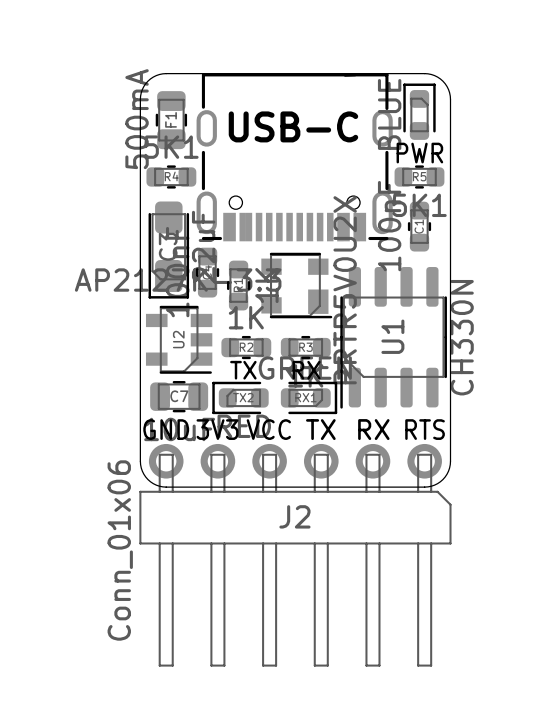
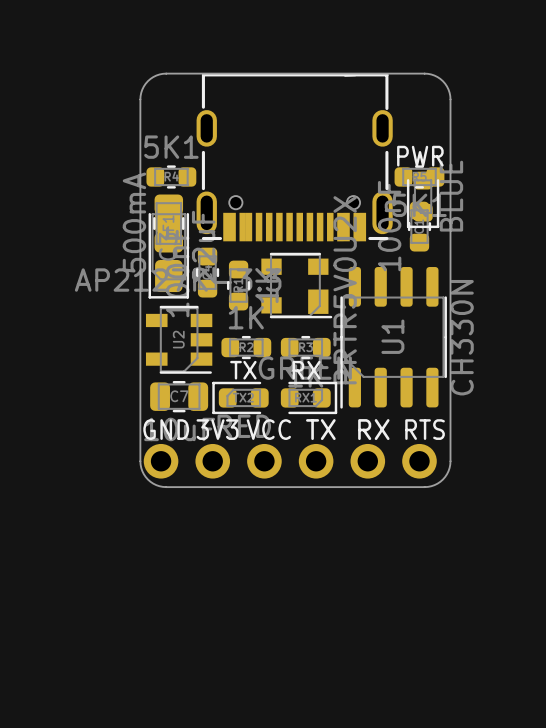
PWR rotation: 0° (419, 111) -> 180° (423, 199)
PWR position: (419, 111) -> (423, 199)
F1 position: (171, 120) -> (168, 223)
USB-C name: USB-C (293, 126) -> none
J2 side: top (295, 555) -> bottom (290, 461)

